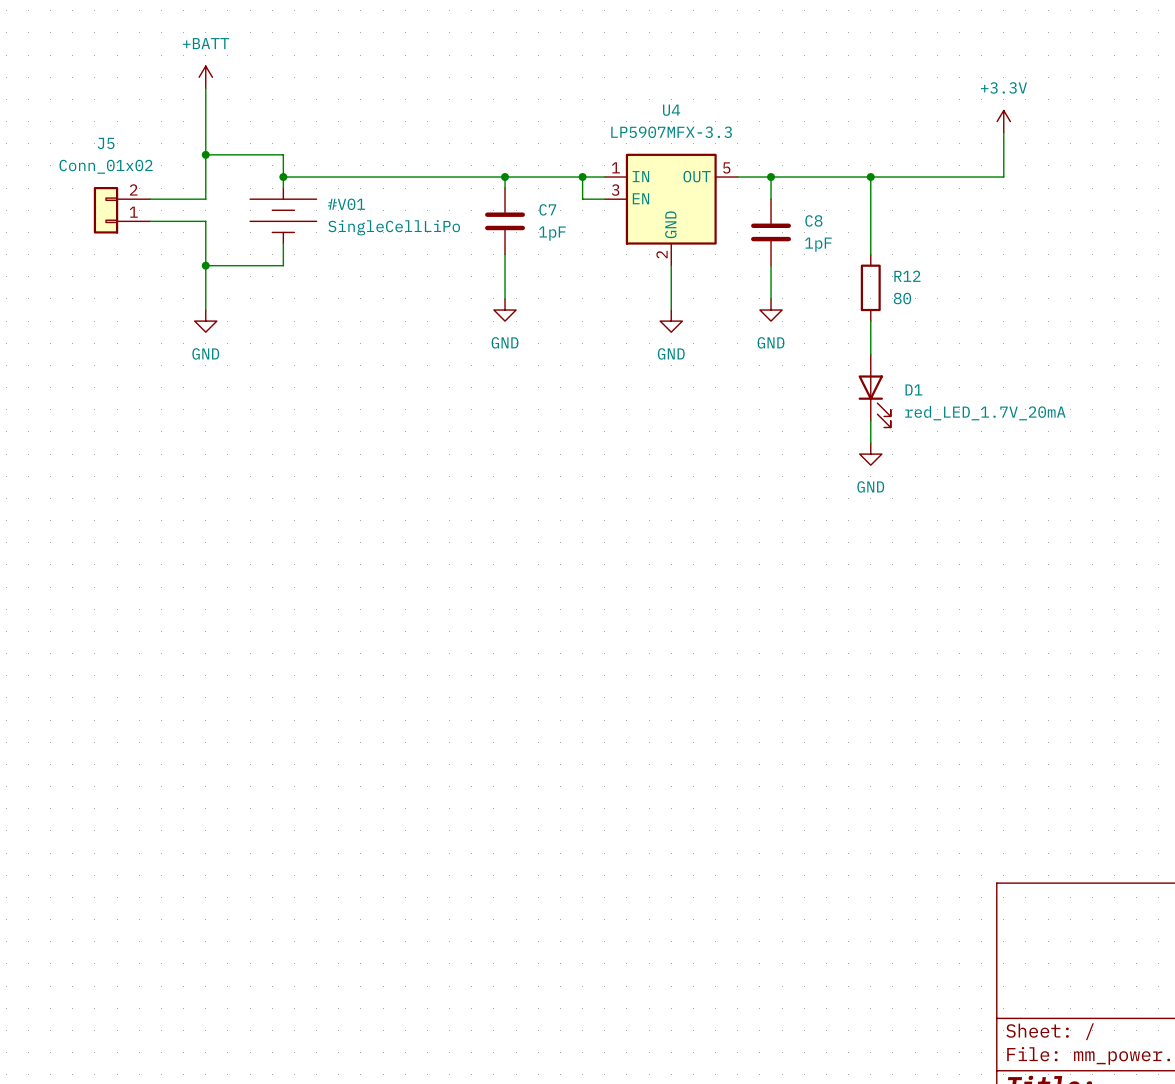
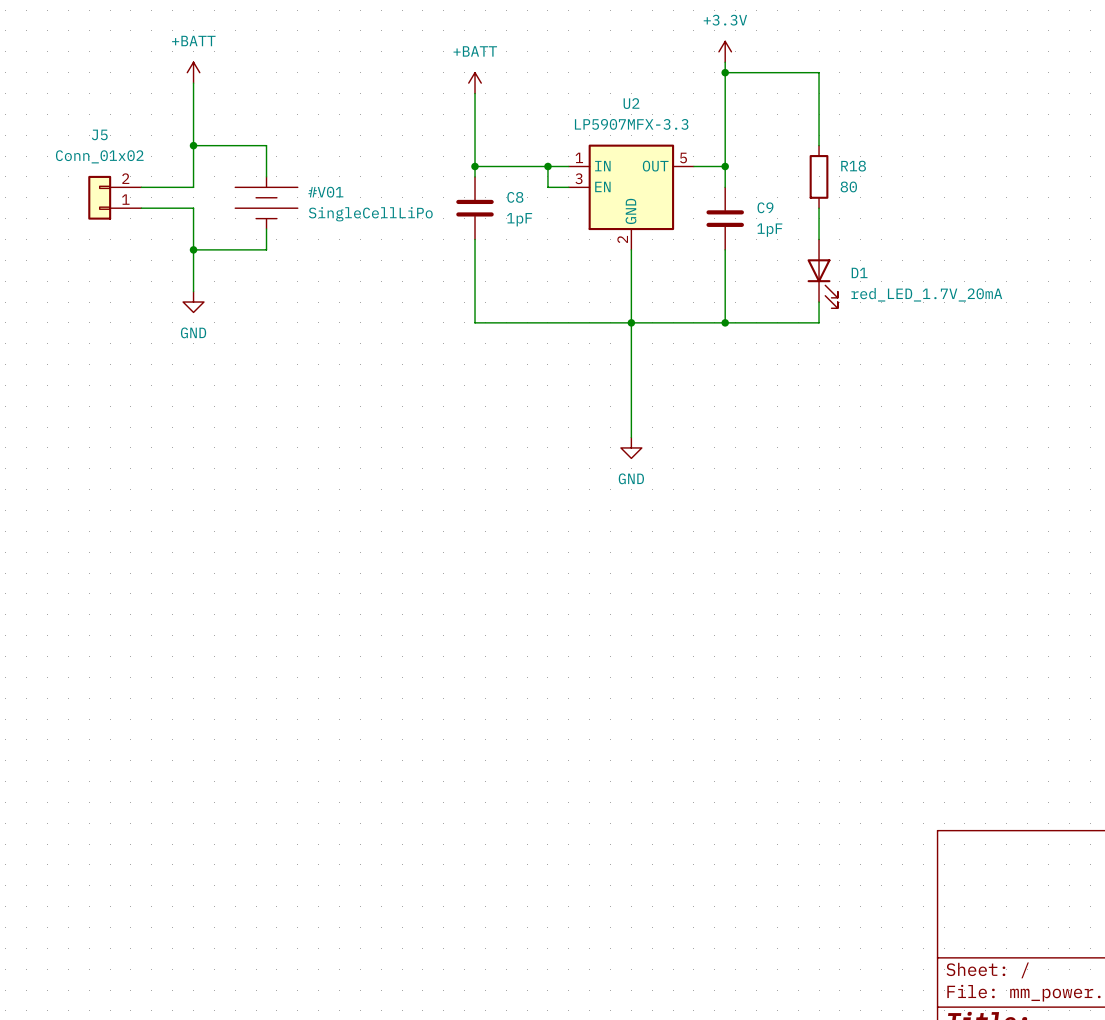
power symbol: none -> +3.3V (725, 51)
wire: none -> (725, 72) (819, 72) (819, 145)
junction: none -> (725, 72)
power symbol: none -> +BATT (475, 83)
U4 name: U4 (671, 110) -> U2 (631, 103)
power symbol: +3.3V (1003, 121) -> none
wire: (1003, 132) (1003, 177) (771, 177) -> (725, 62) (725, 166)
wire: (283, 177) (505, 177) -> (475, 93) (475, 166)
junction: (283, 177) -> none
wire: (870, 177) (870, 221) -> (725, 281) (725, 322)
junction: (870, 177) -> none
R18: none -> 80 (819, 176)
C7 name: C7 (547, 209) -> C8 (515, 197)
C8 name: C8 (813, 220) -> C9 (765, 207)
R12: 80 (870, 287) -> none
power symbol: GND (505, 310) -> none
wire: none -> (631, 291) (631, 437)
power symbol: GND (771, 310) -> none
power symbol: GND (671, 321) -> none
junction: none -> (631, 322)
junction: none -> (725, 322)
wire: (870, 343) (870, 354) -> (819, 322) (475, 322) (475, 281)
D1 position: (874, 390) -> (822, 273)
wire: (870, 420) (870, 443) -> none
power symbol: GND (870, 454) -> none
power symbol: none -> GND (631, 447)

